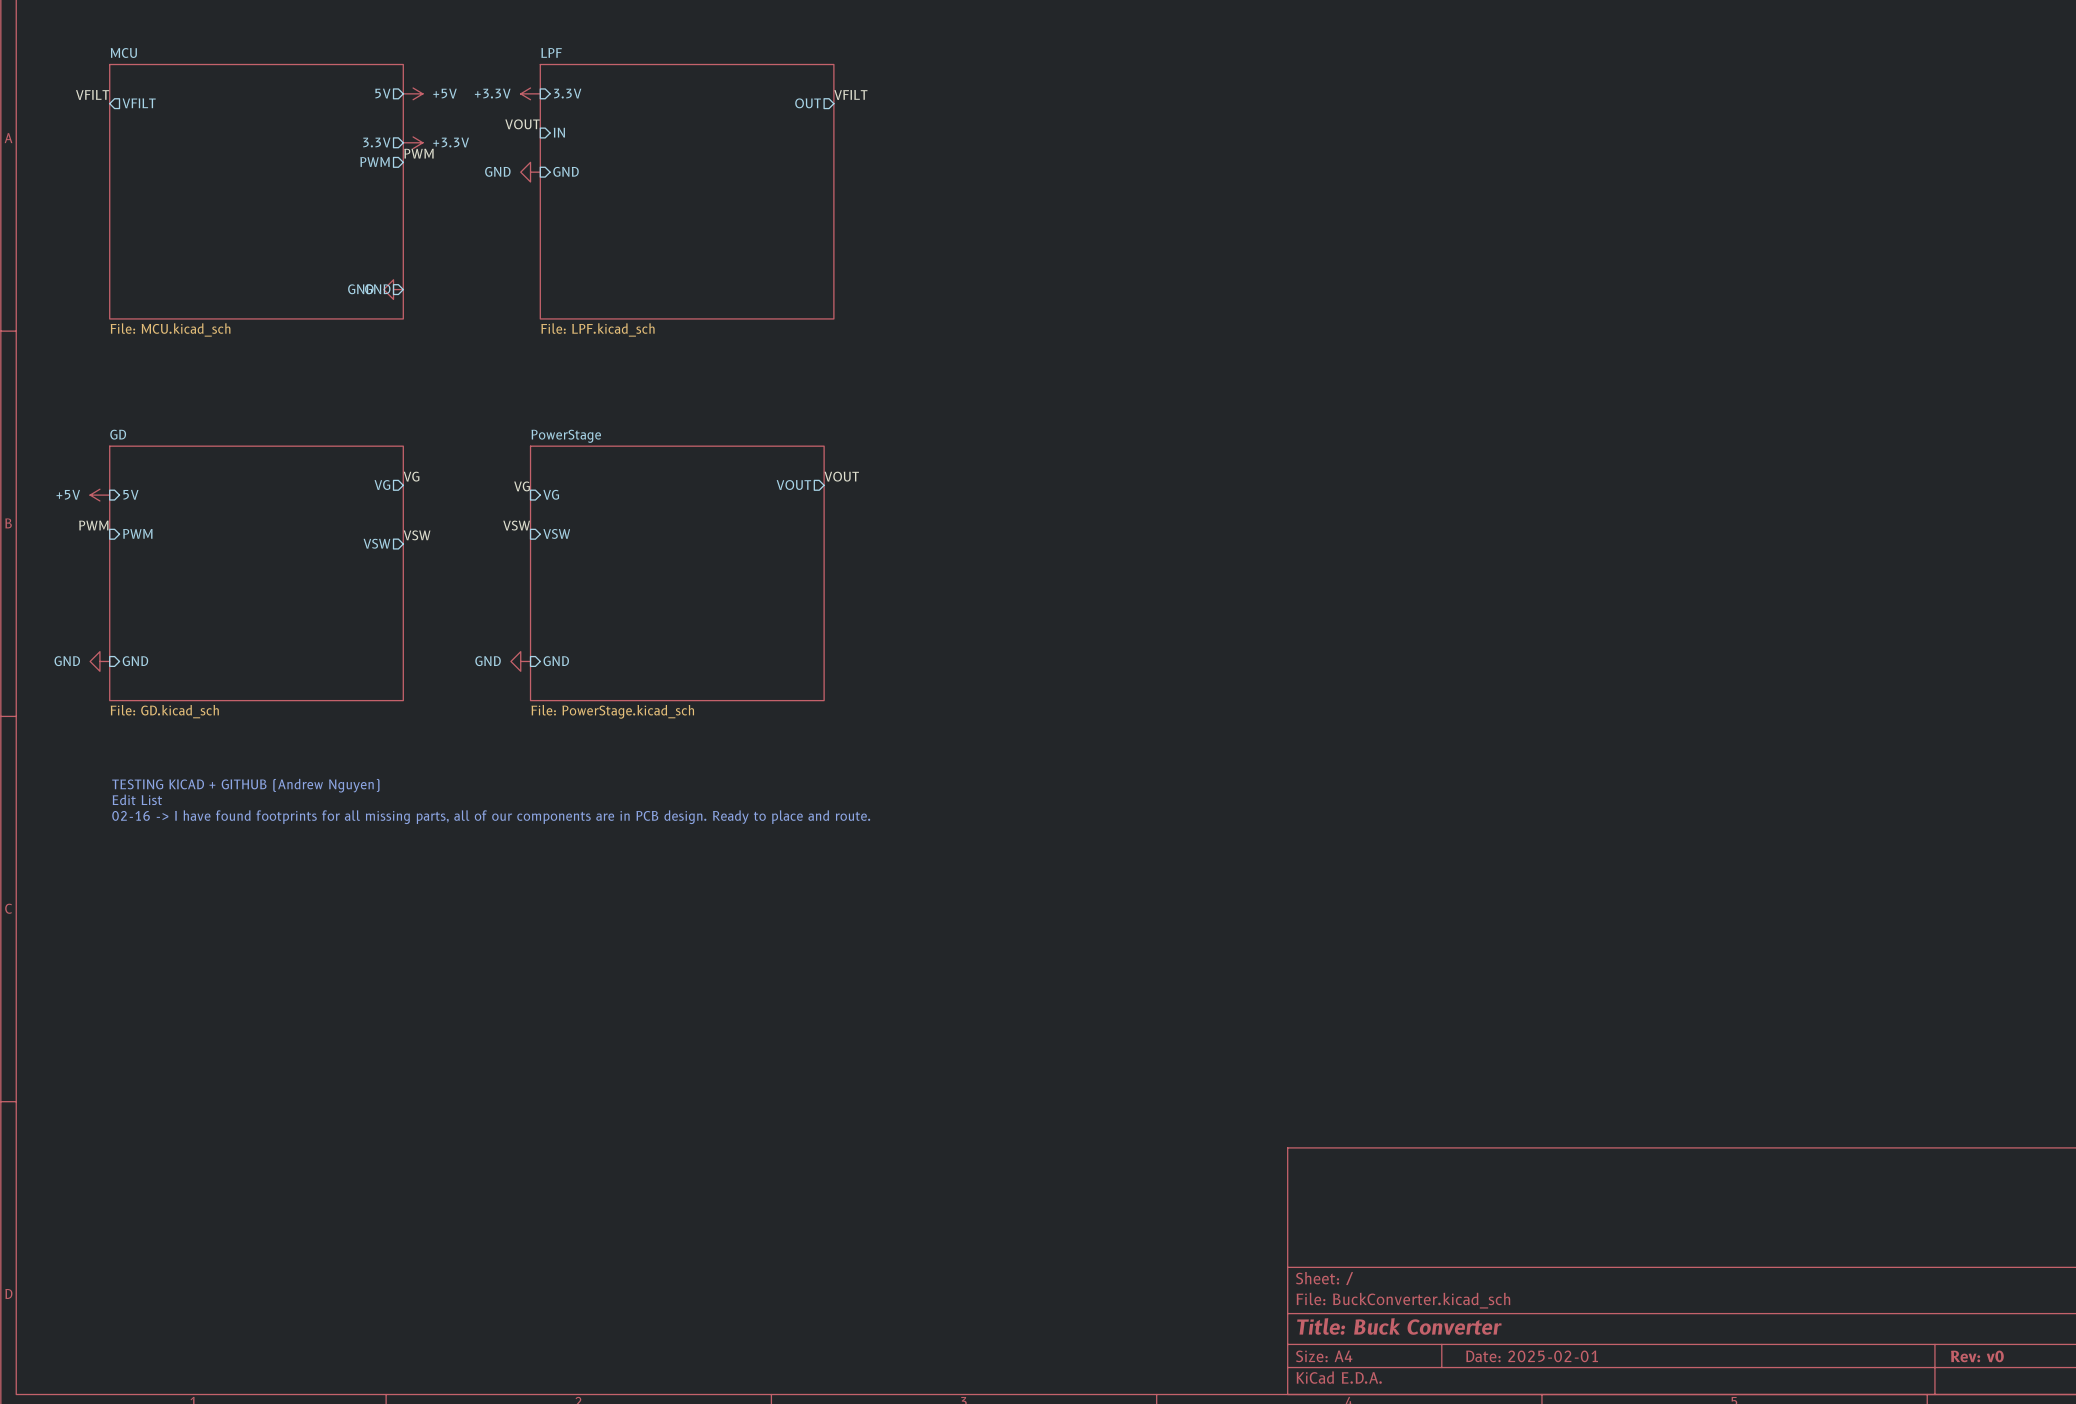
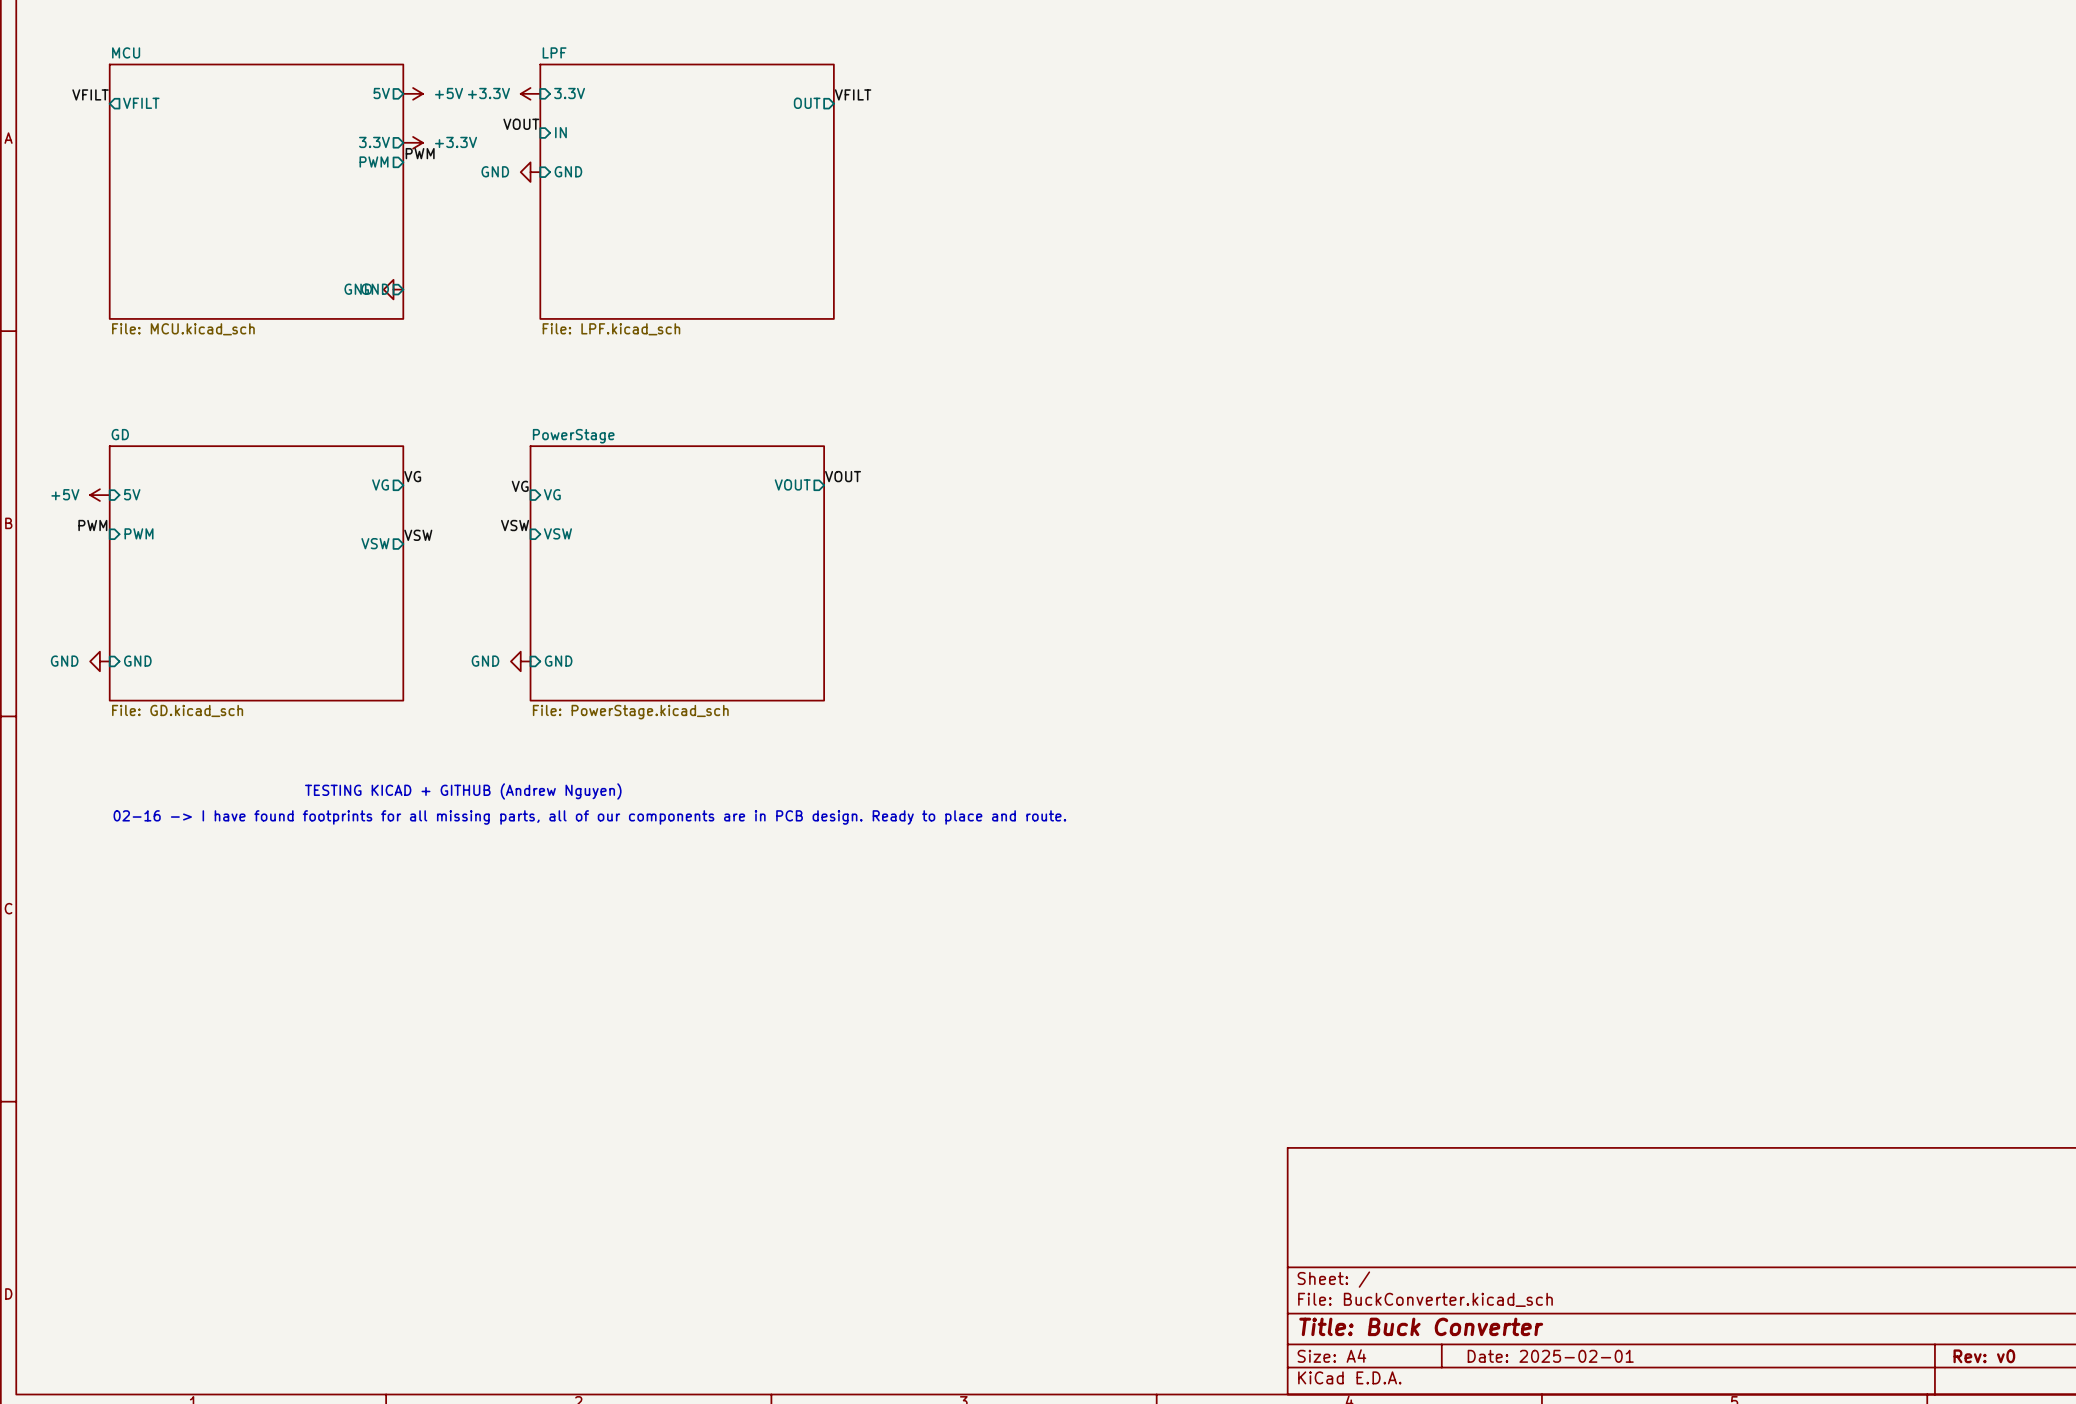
text: TESTING KICAD + GITHUB (Andrew Nguyen) (245, 785) -> none
text: none -> TESTING KICAD + GITHUB (Andrew Nguyen) (463, 791)
text: Edit List (137, 799) -> none

